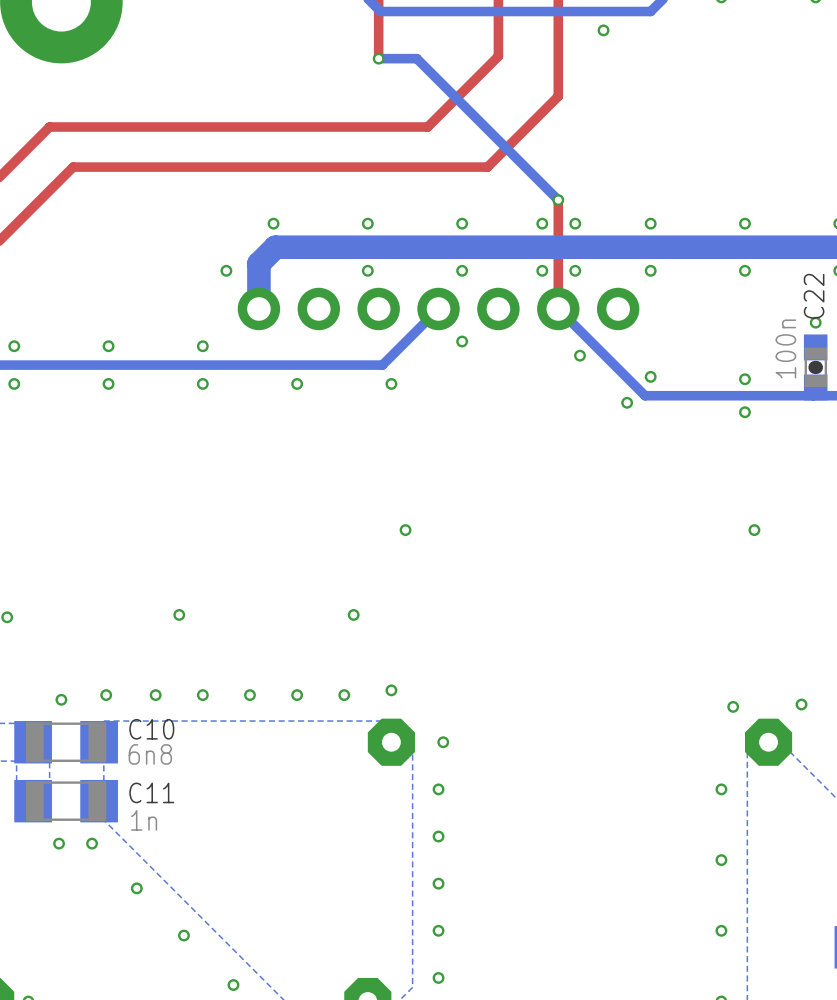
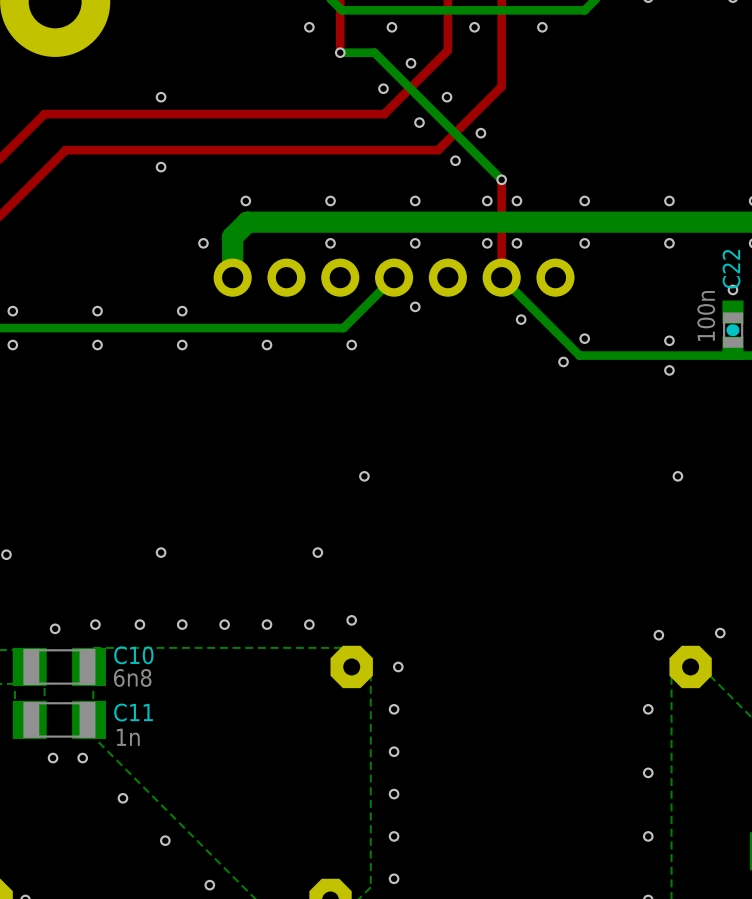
via: none -> (309, 27)
via: none -> (391, 27)
via: none -> (474, 27)
via: none -> (411, 63)
via: none -> (383, 88)
via: none -> (161, 97)
via: none -> (447, 97)
via: none -> (419, 122)
via: none -> (480, 133)
via: none -> (455, 160)
via: none -> (161, 167)

